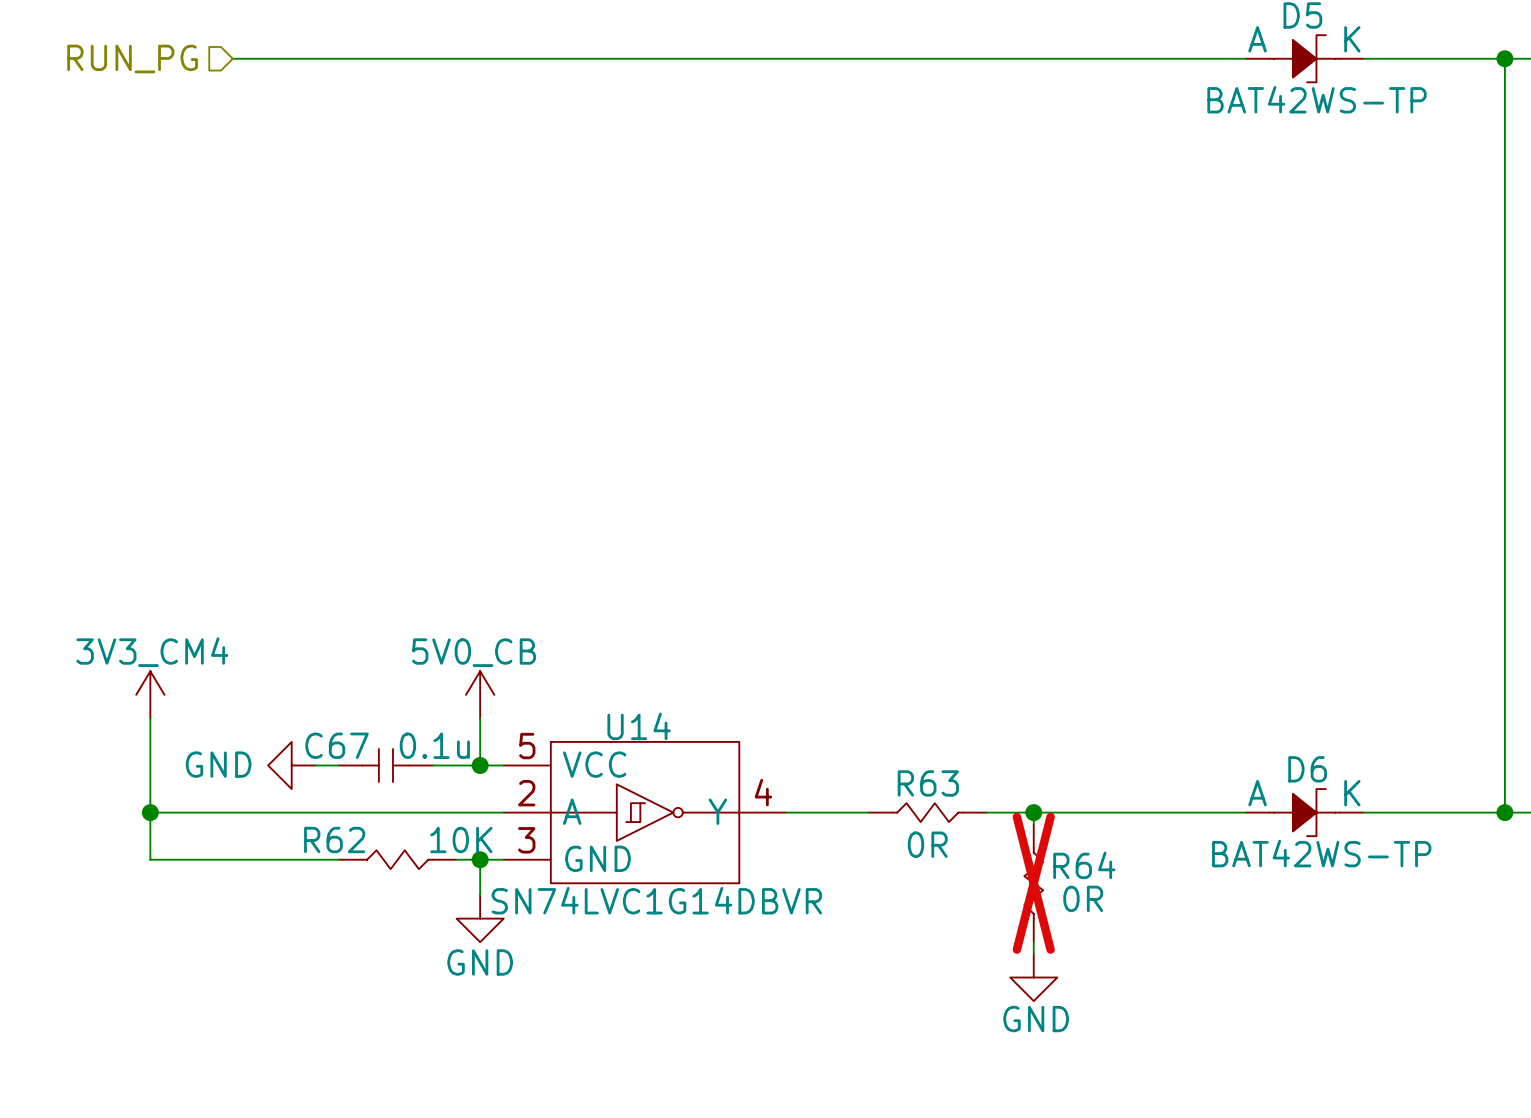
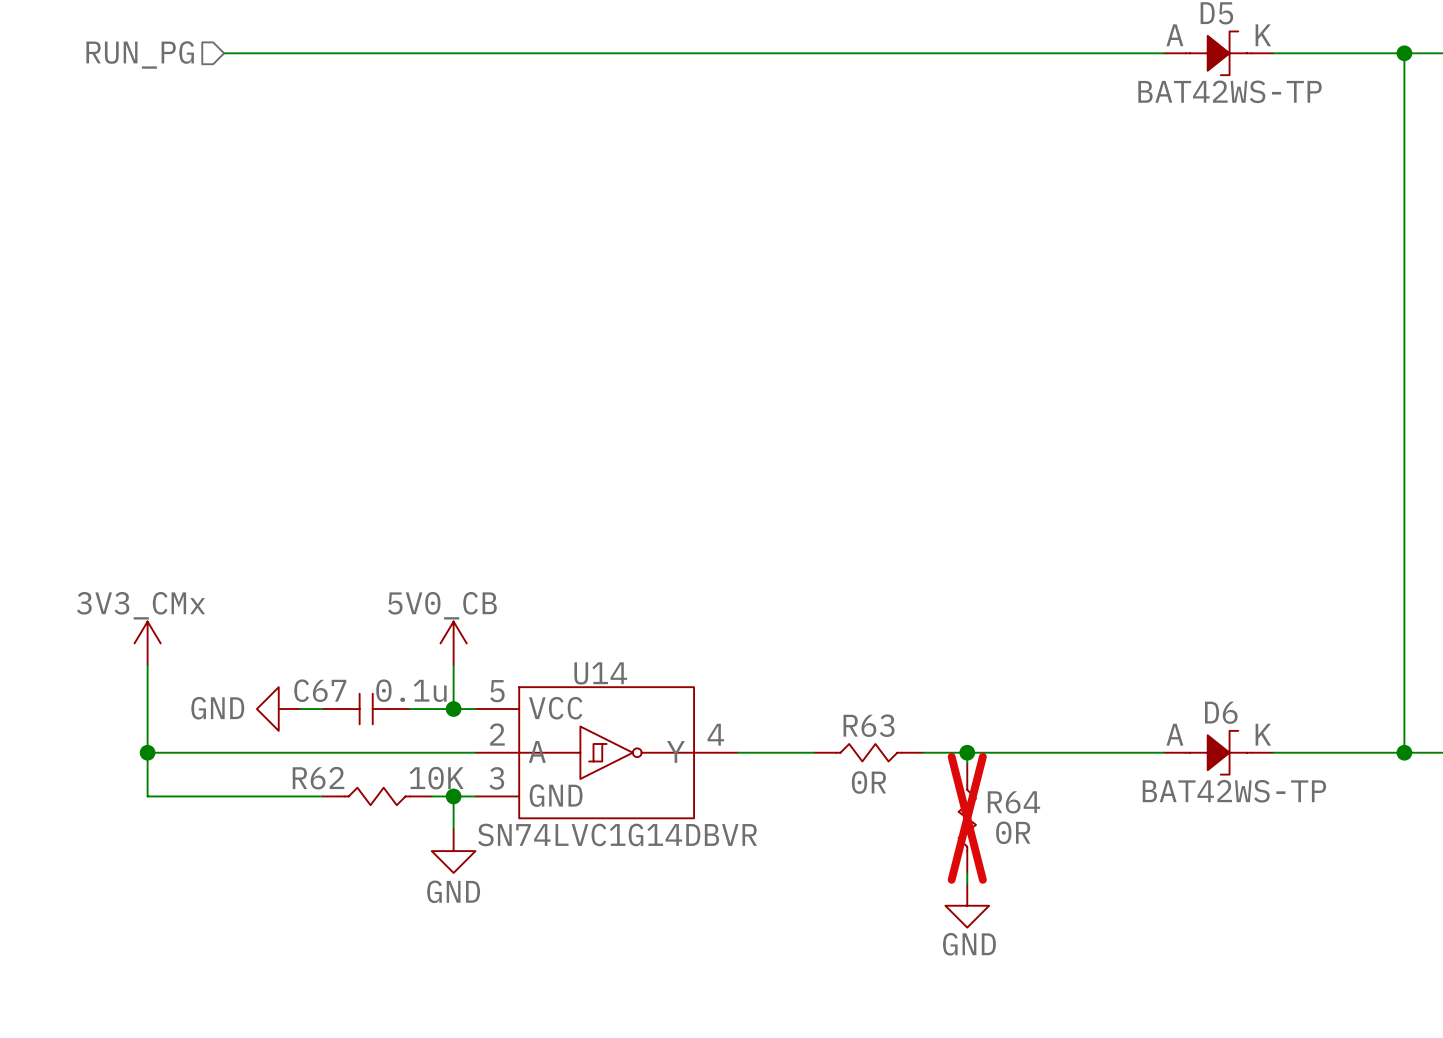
power symbol: 3V3_CM4 (150, 694) -> 3V3_CMx (147, 643)

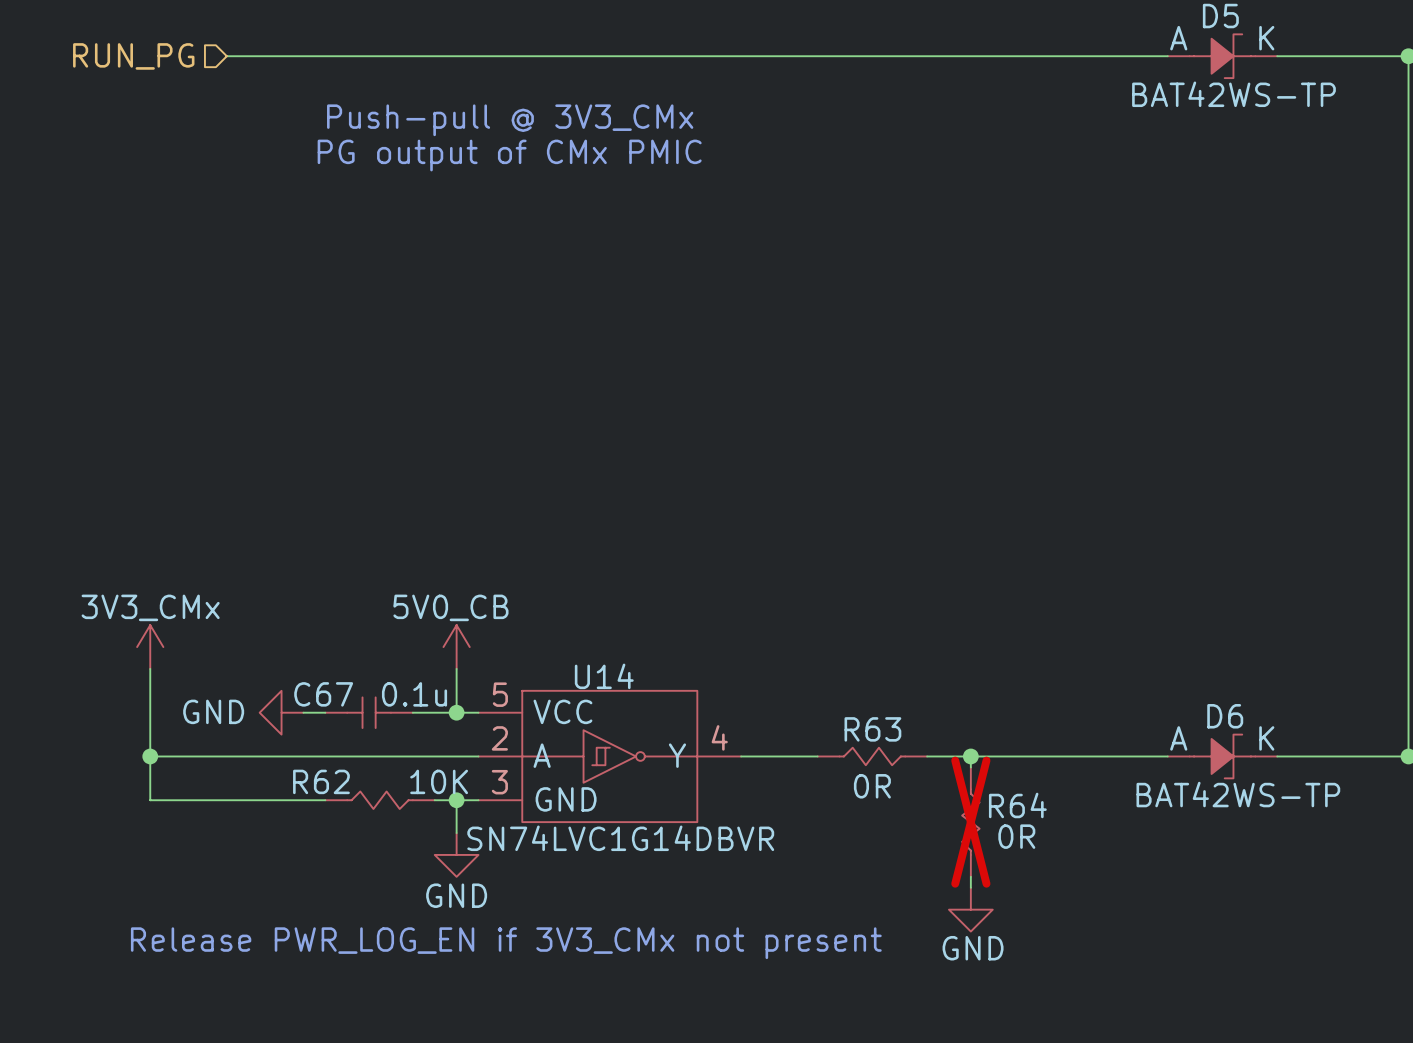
text: none -> Push-pull @ 3V3_CMx (510, 120)
text: none -> PG output of CMx PMIC (509, 155)
text: none -> Release PWR_LOG_EN if 3V3_CMx not present (506, 943)

